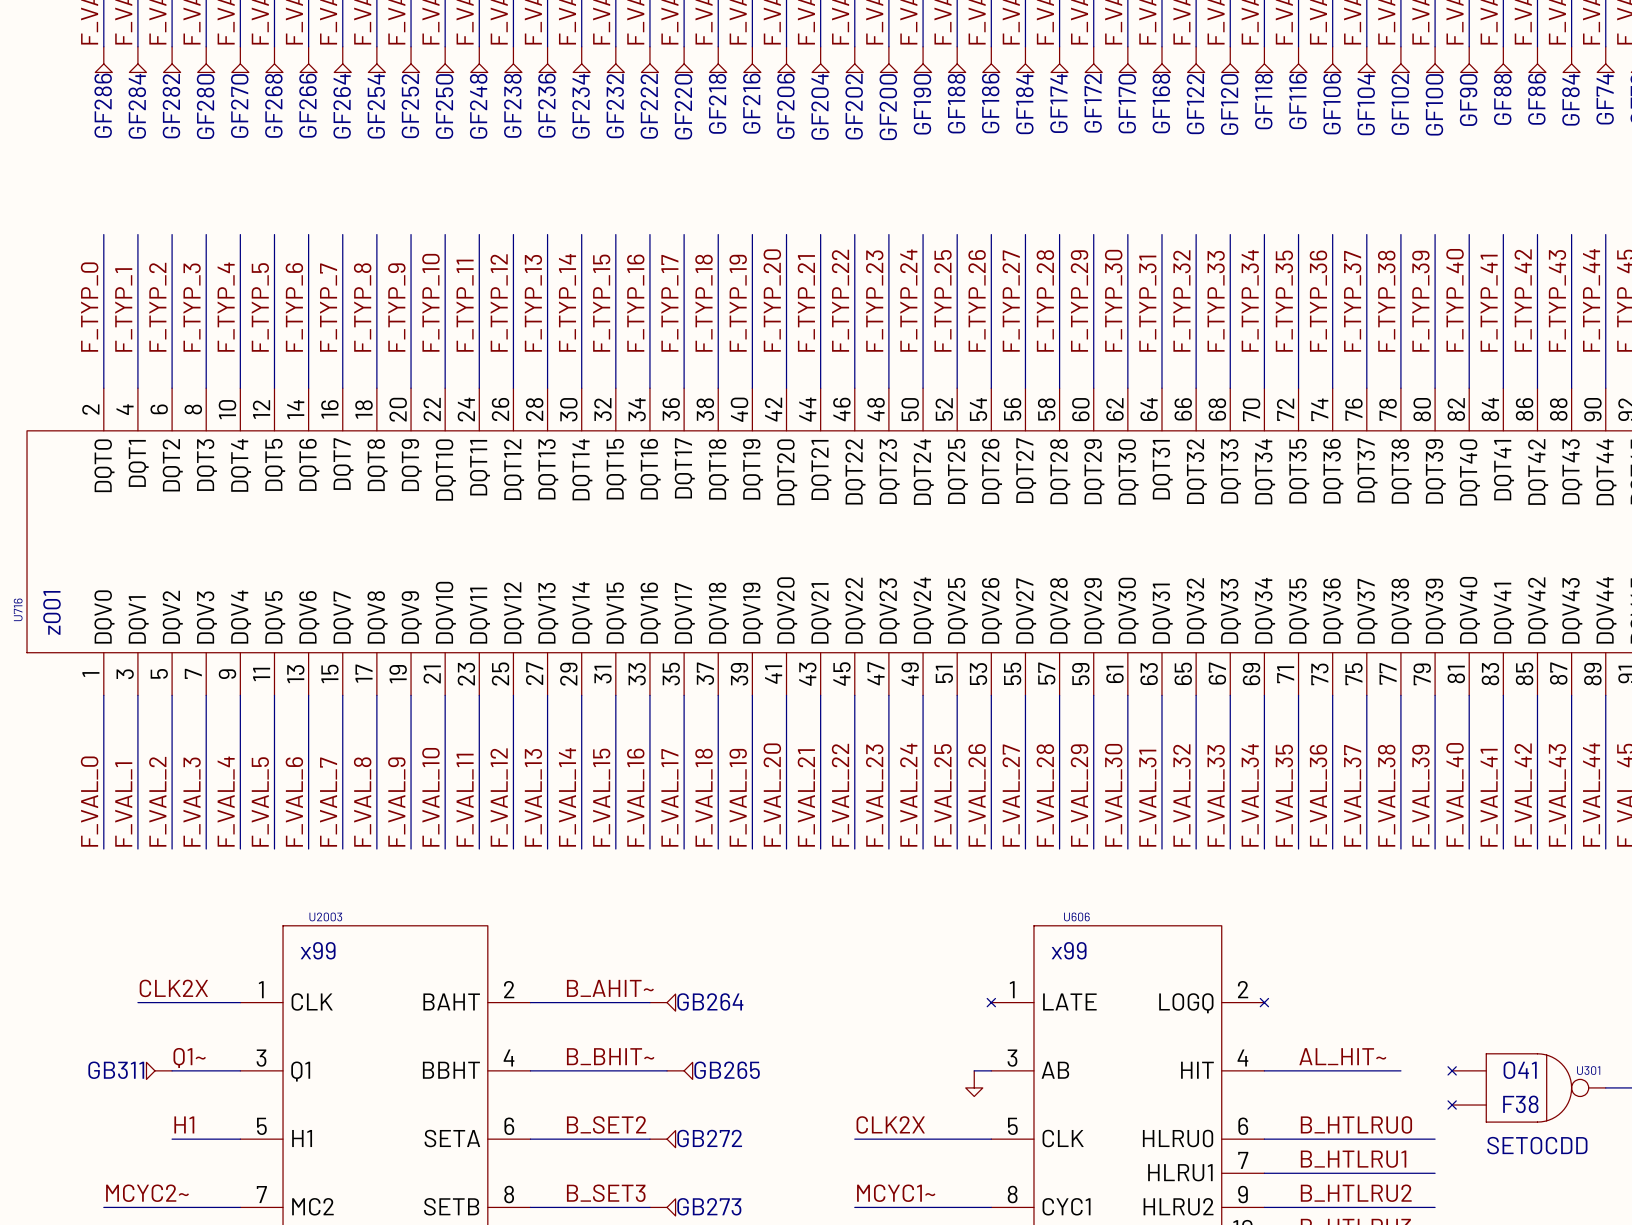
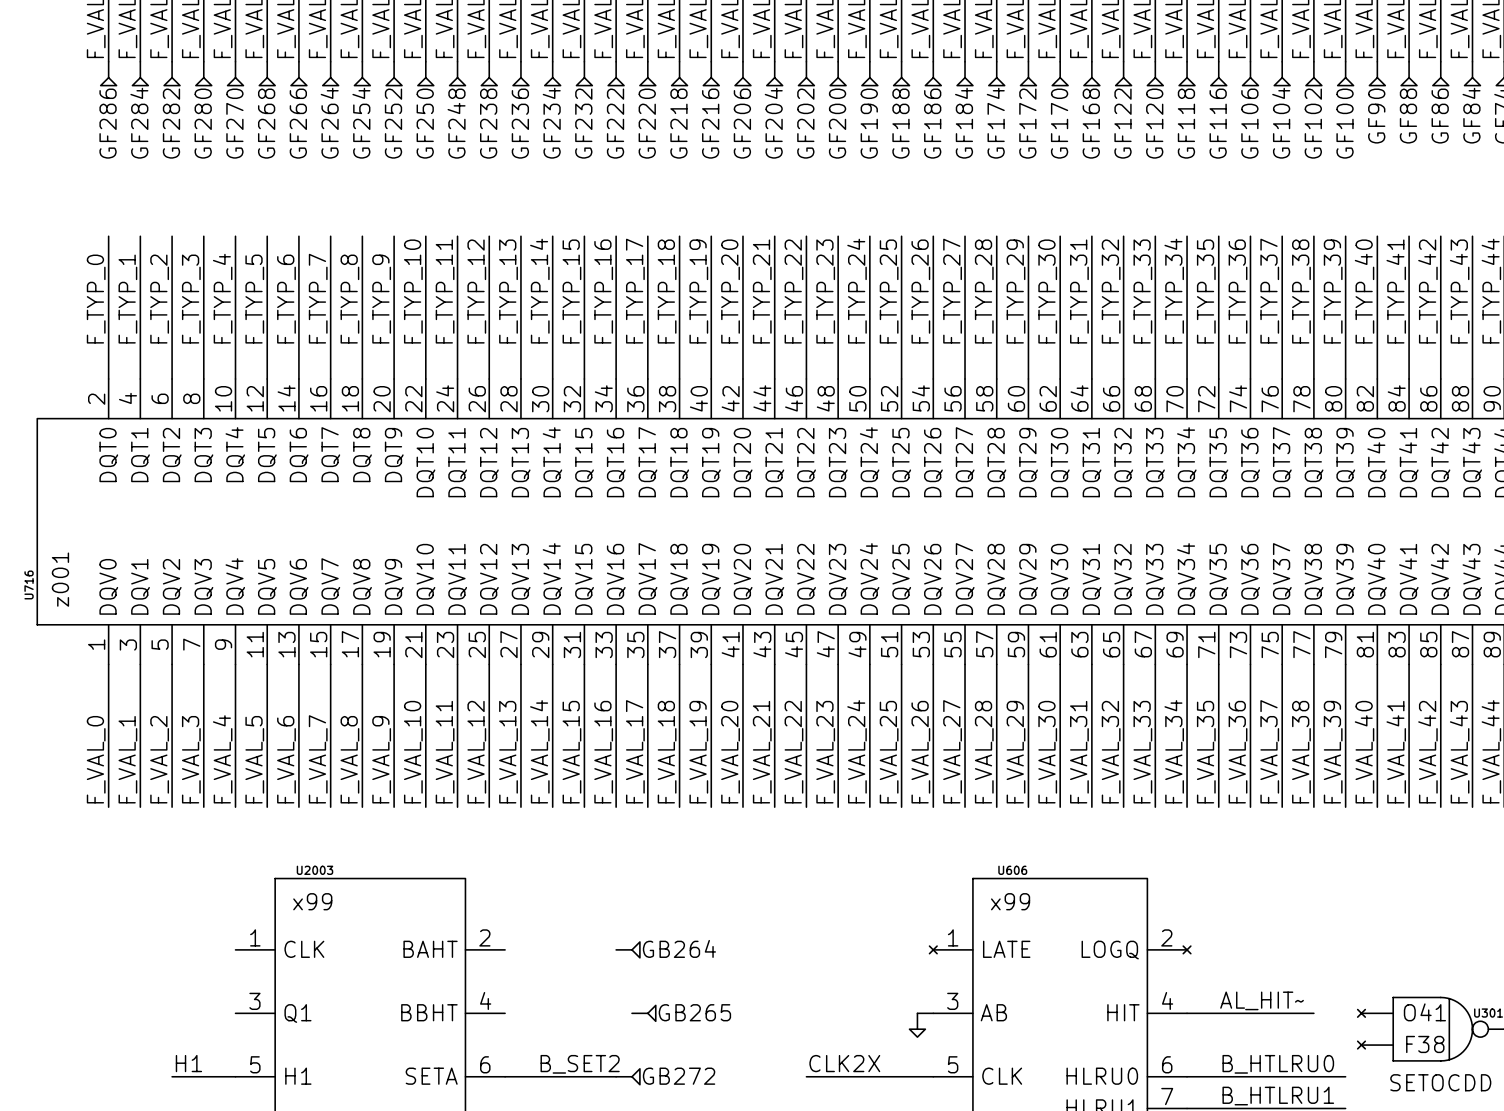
label: CLK2X (173, 988) -> none
label: B_AHIT~ (610, 988) -> none
wire: (137, 1002) (240, 1002) -> none
wire: (530, 1002) (649, 1002) -> none
label: B_BHIT~ (610, 1056) -> none
label: Q1~ (189, 1057) -> none
GB311: (159, 1070) -> none
wire: (172, 1070) (240, 1070) -> none
wire: (530, 1070) (667, 1070) -> none

